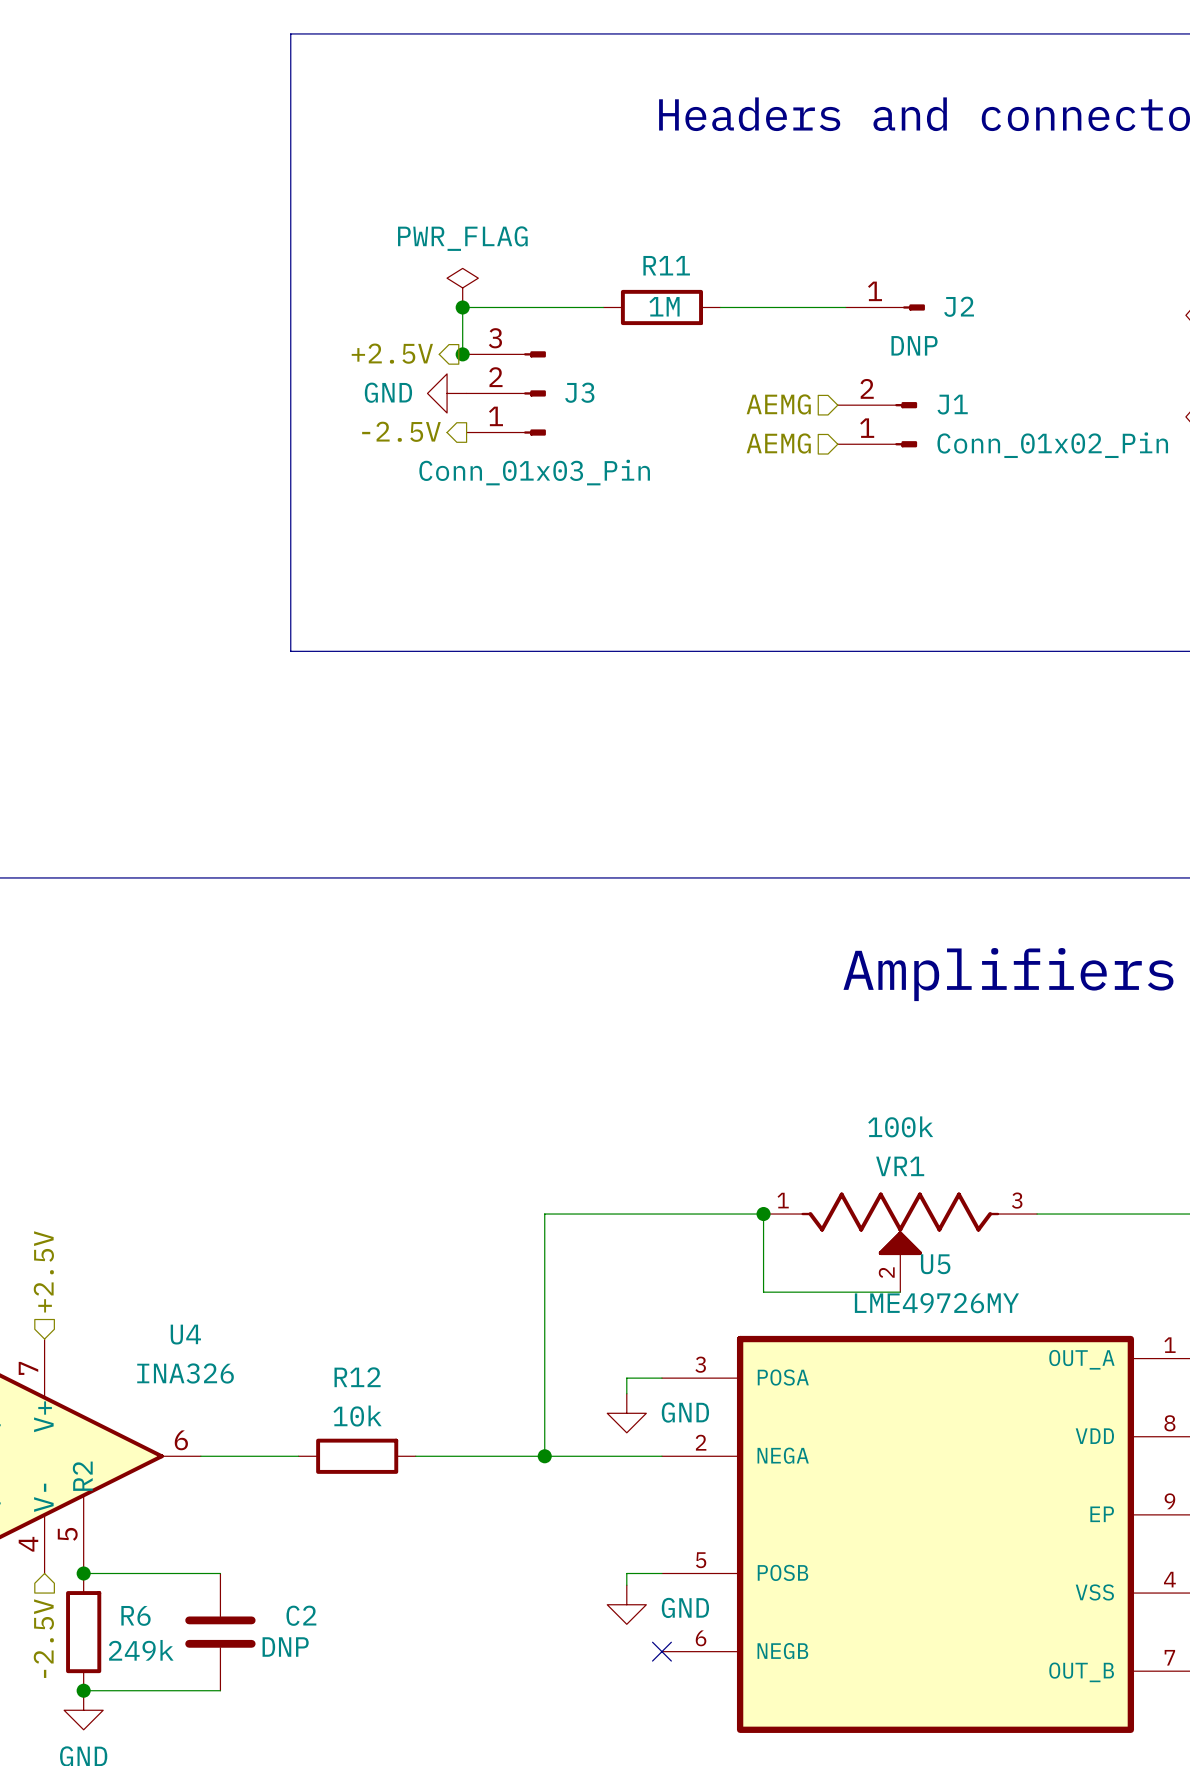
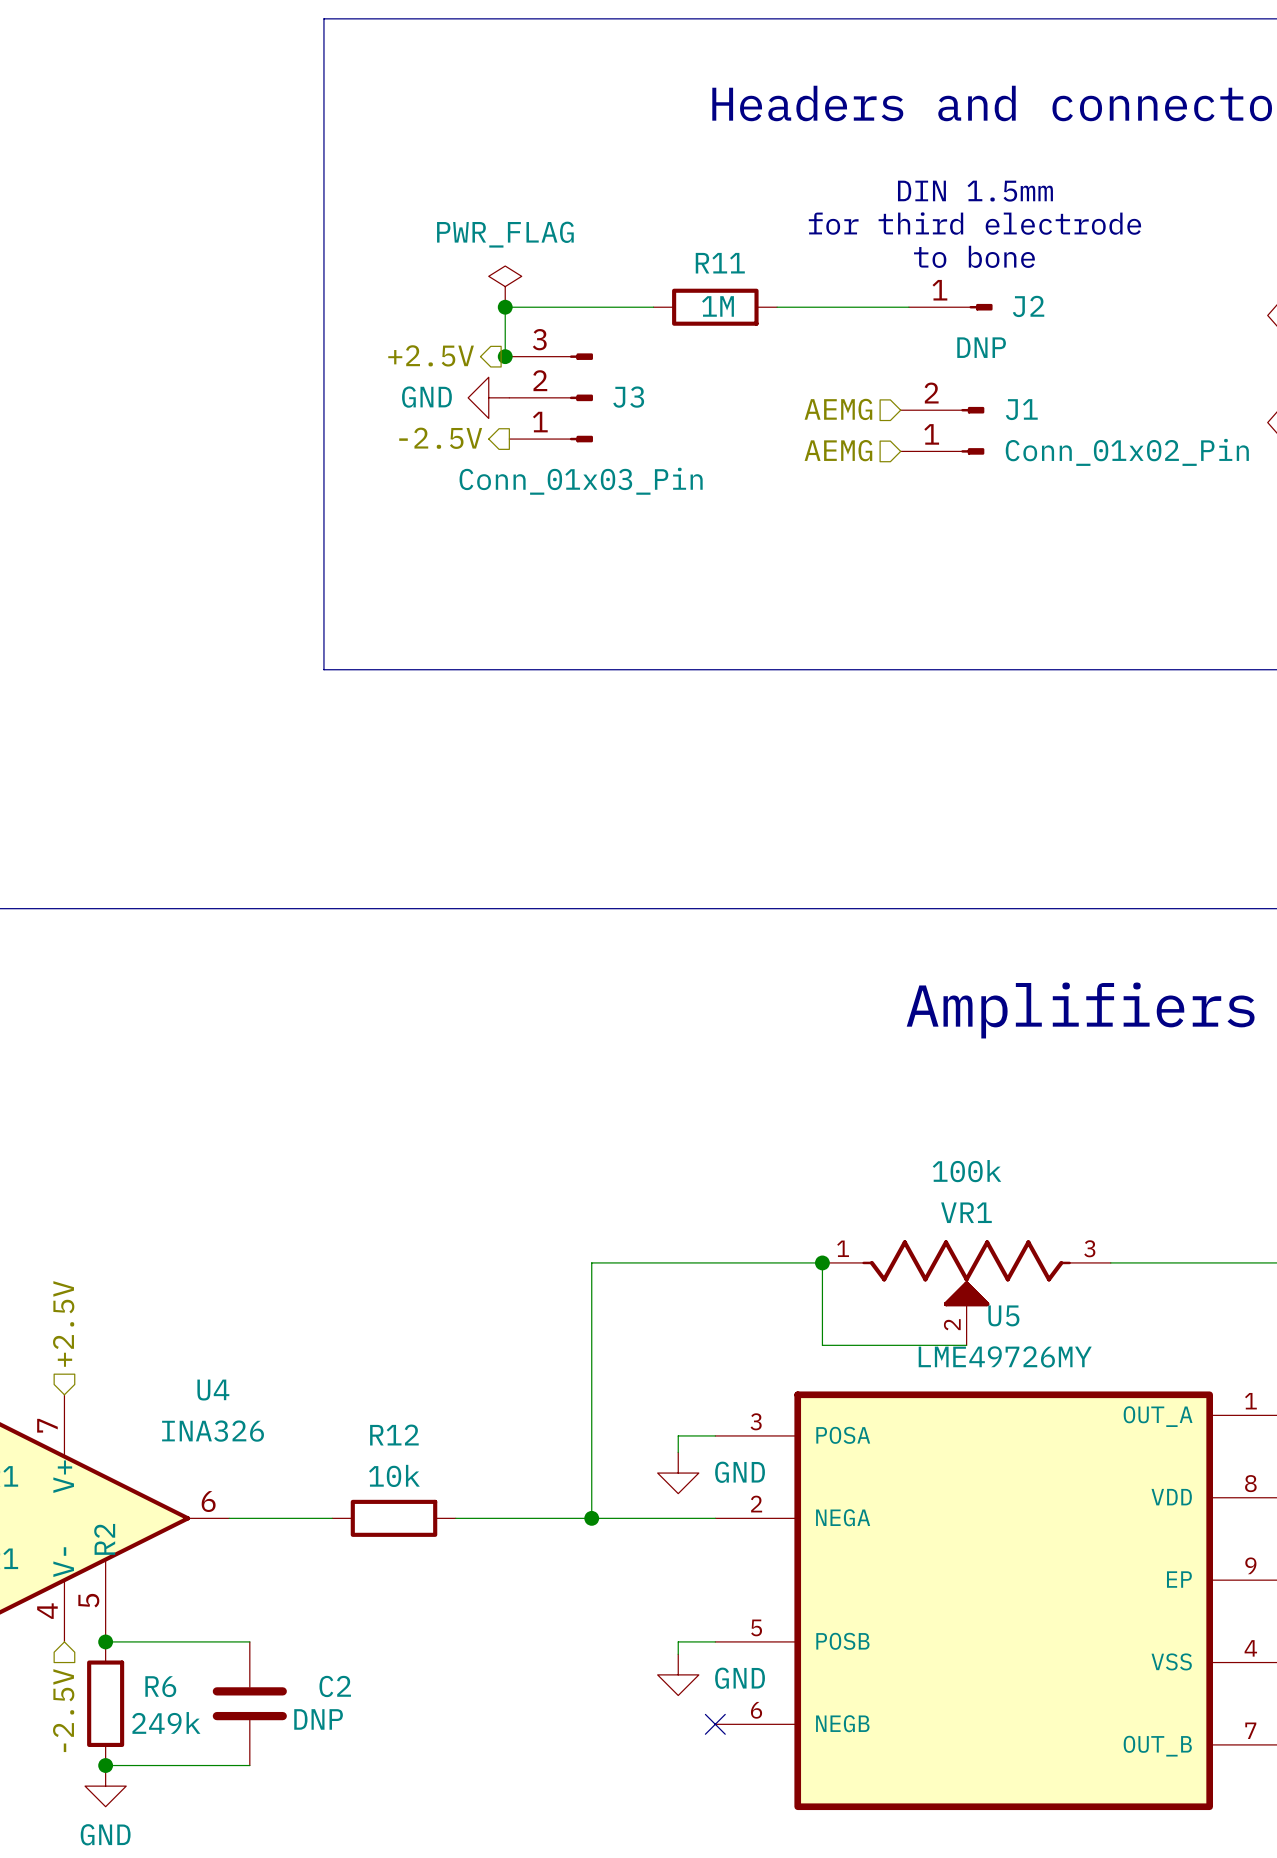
text: none -> DIN 1.5mm (975, 191)
text: none -> for third electrode (974, 223)
text: none -> to bone (974, 256)

